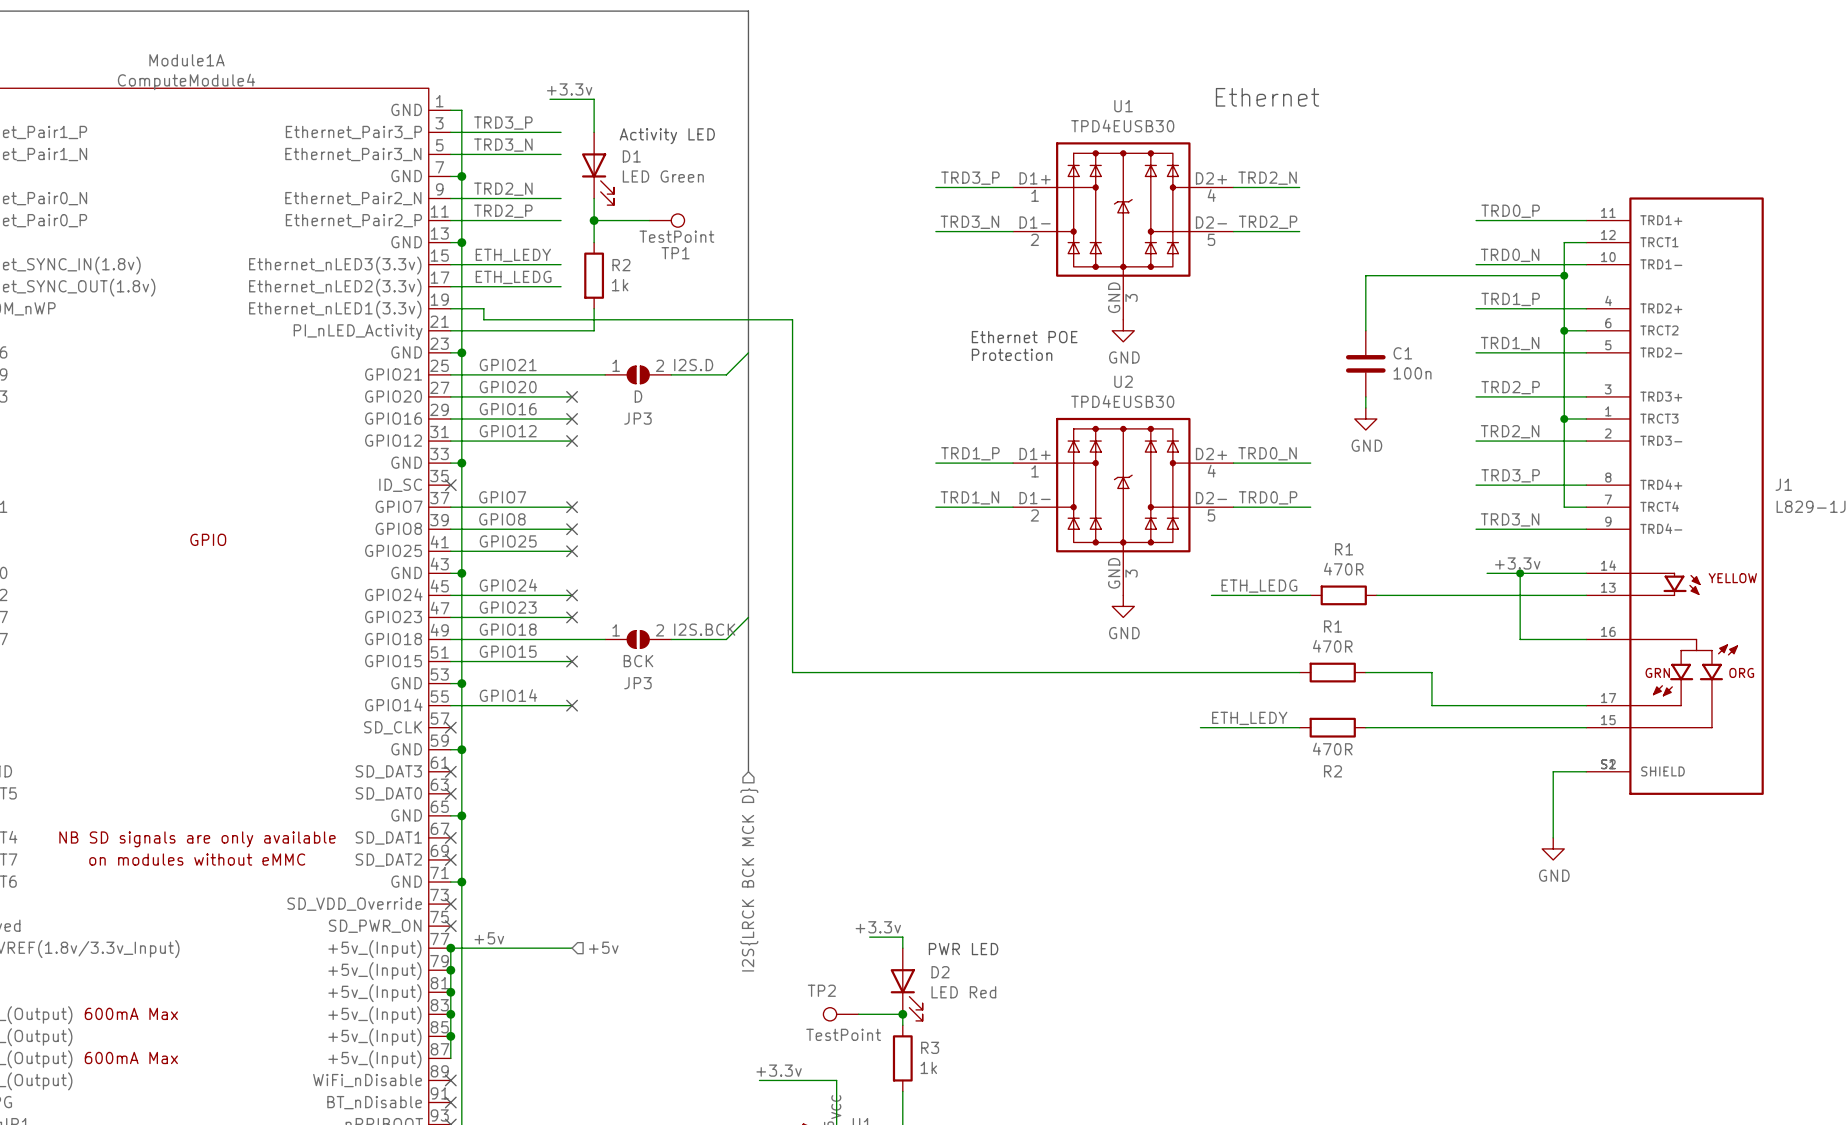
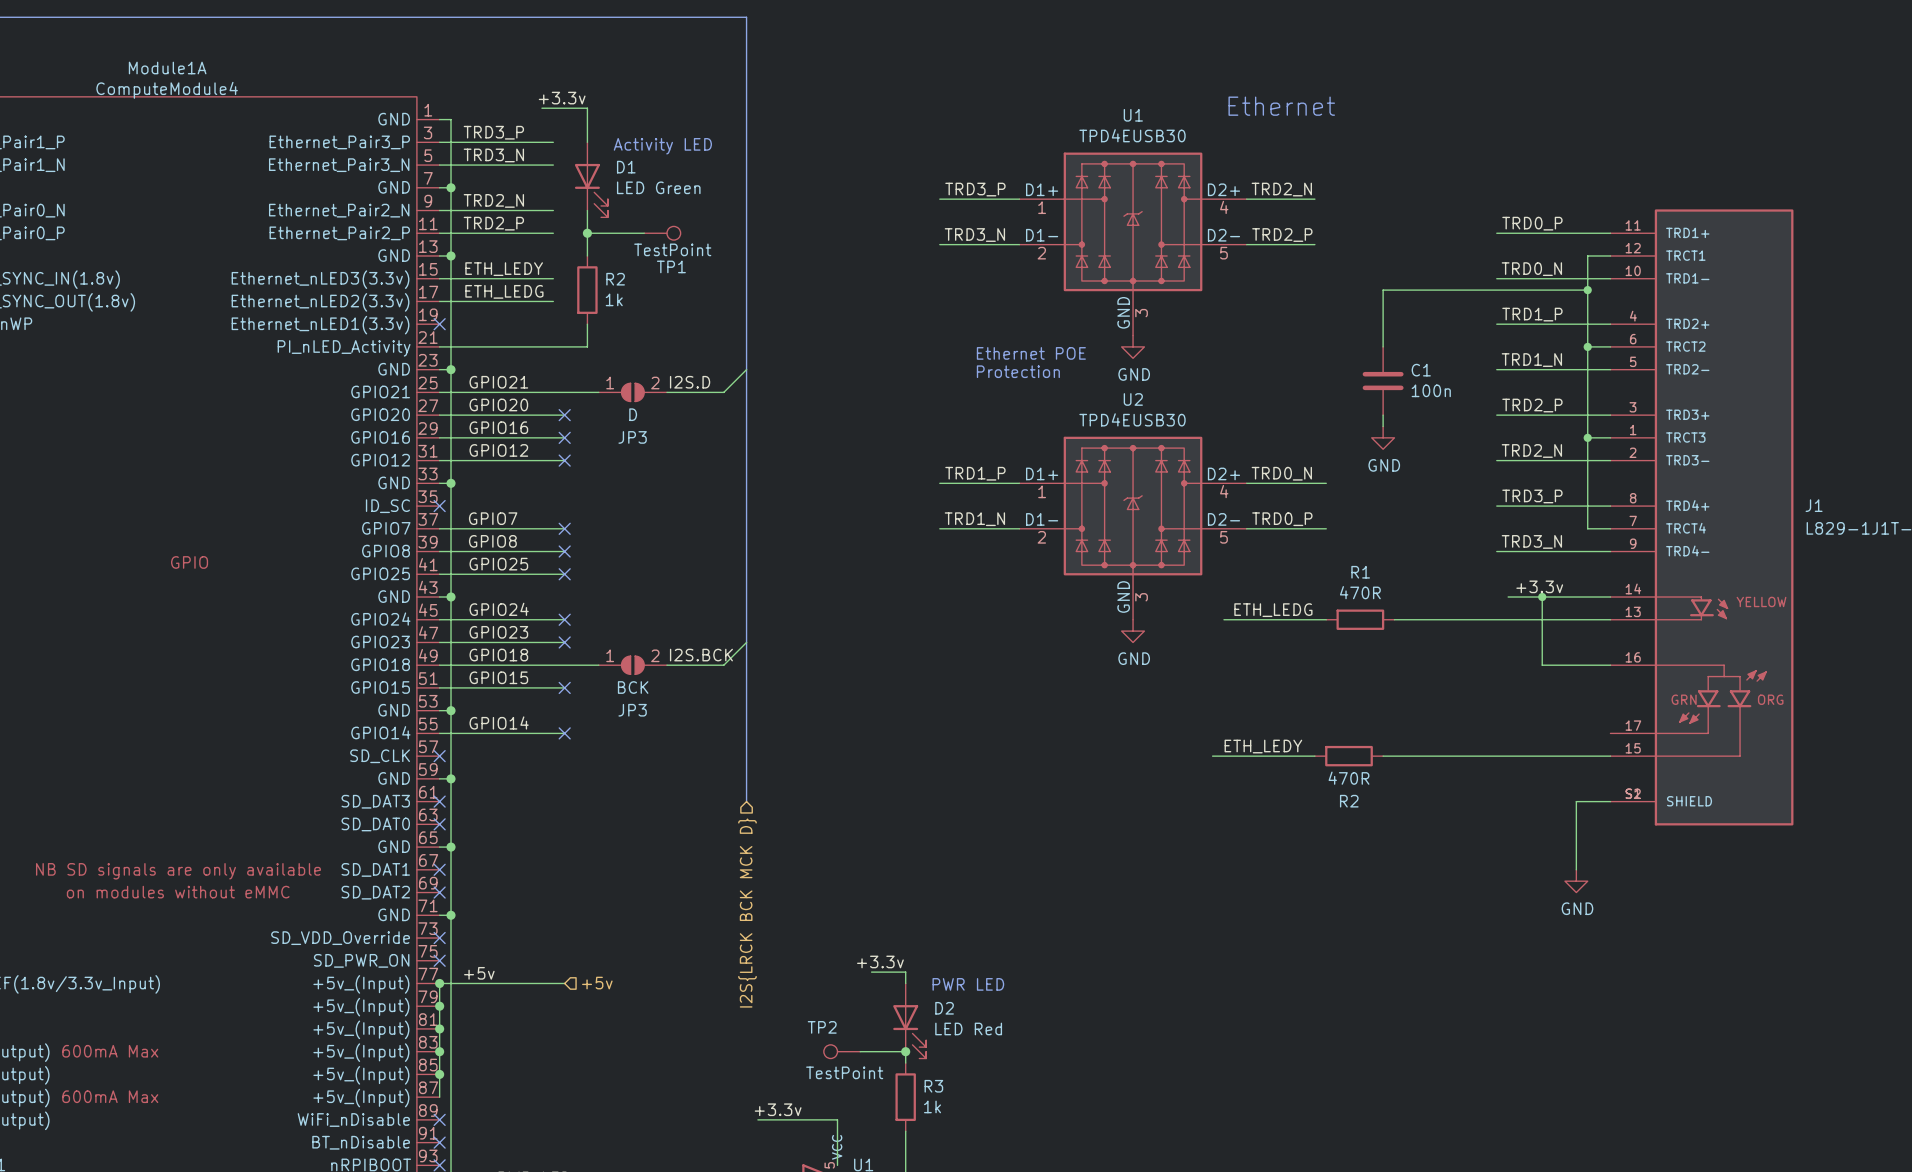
wire: (450, 308) (483, 308) (483, 319) (792, 319) (792, 672) (1299, 672) -> none
no-connect mark: none -> (439, 324)
R1: 470R (1332, 672) -> none
wire: (1365, 672) (1431, 672) (1431, 705) (1586, 705) -> none

